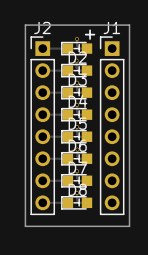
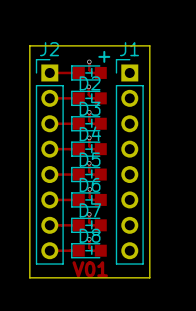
text: none -> V01 (90, 269)

